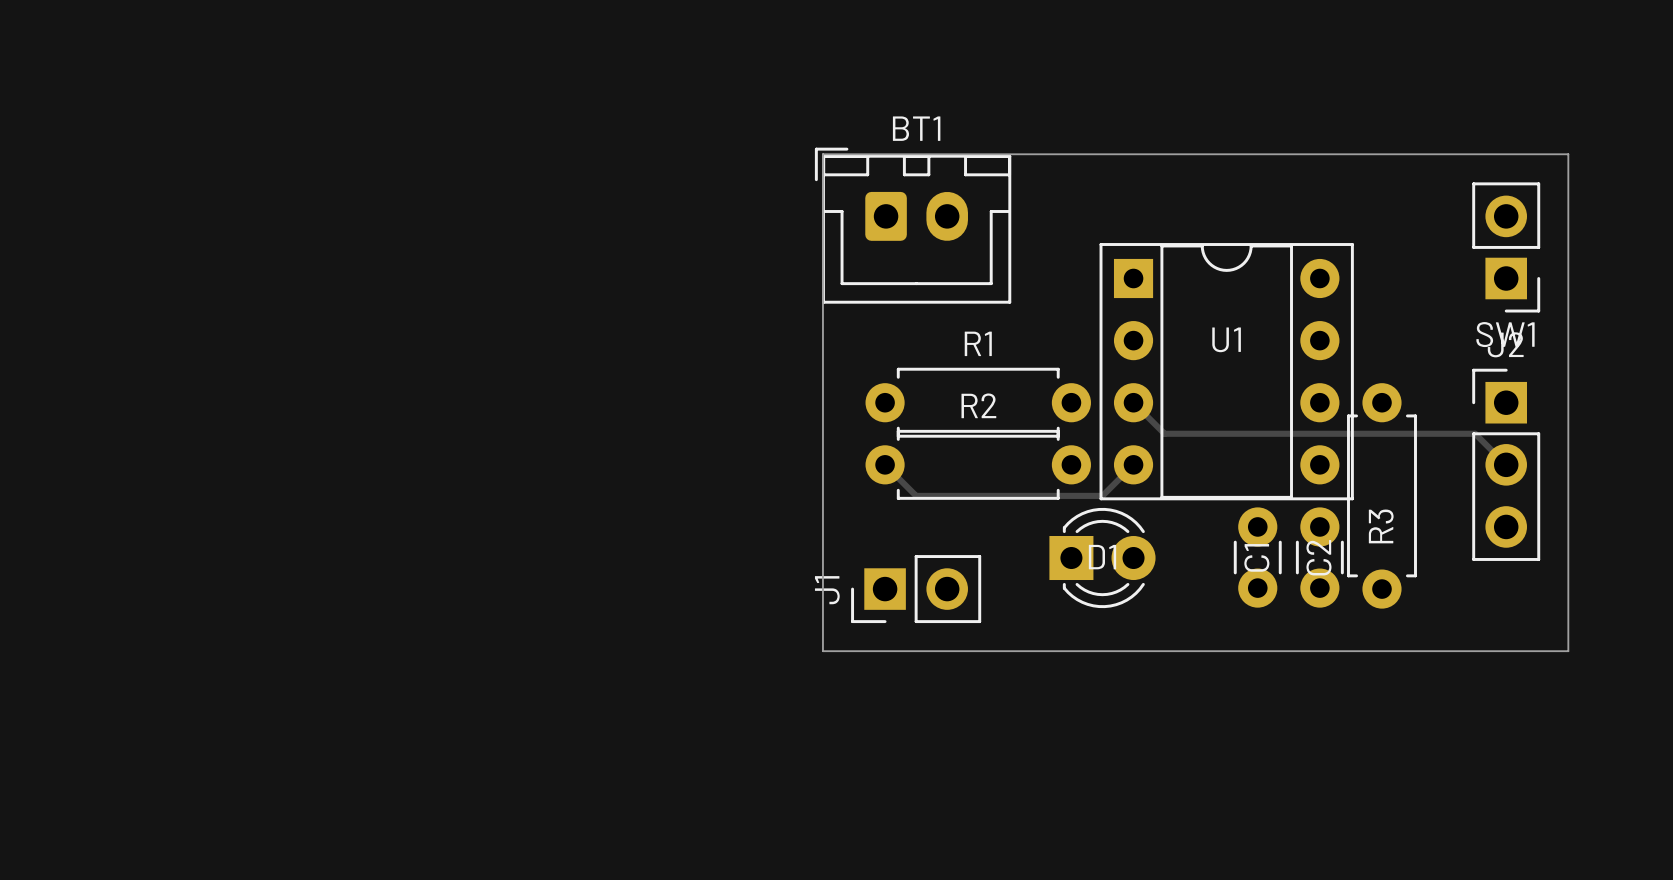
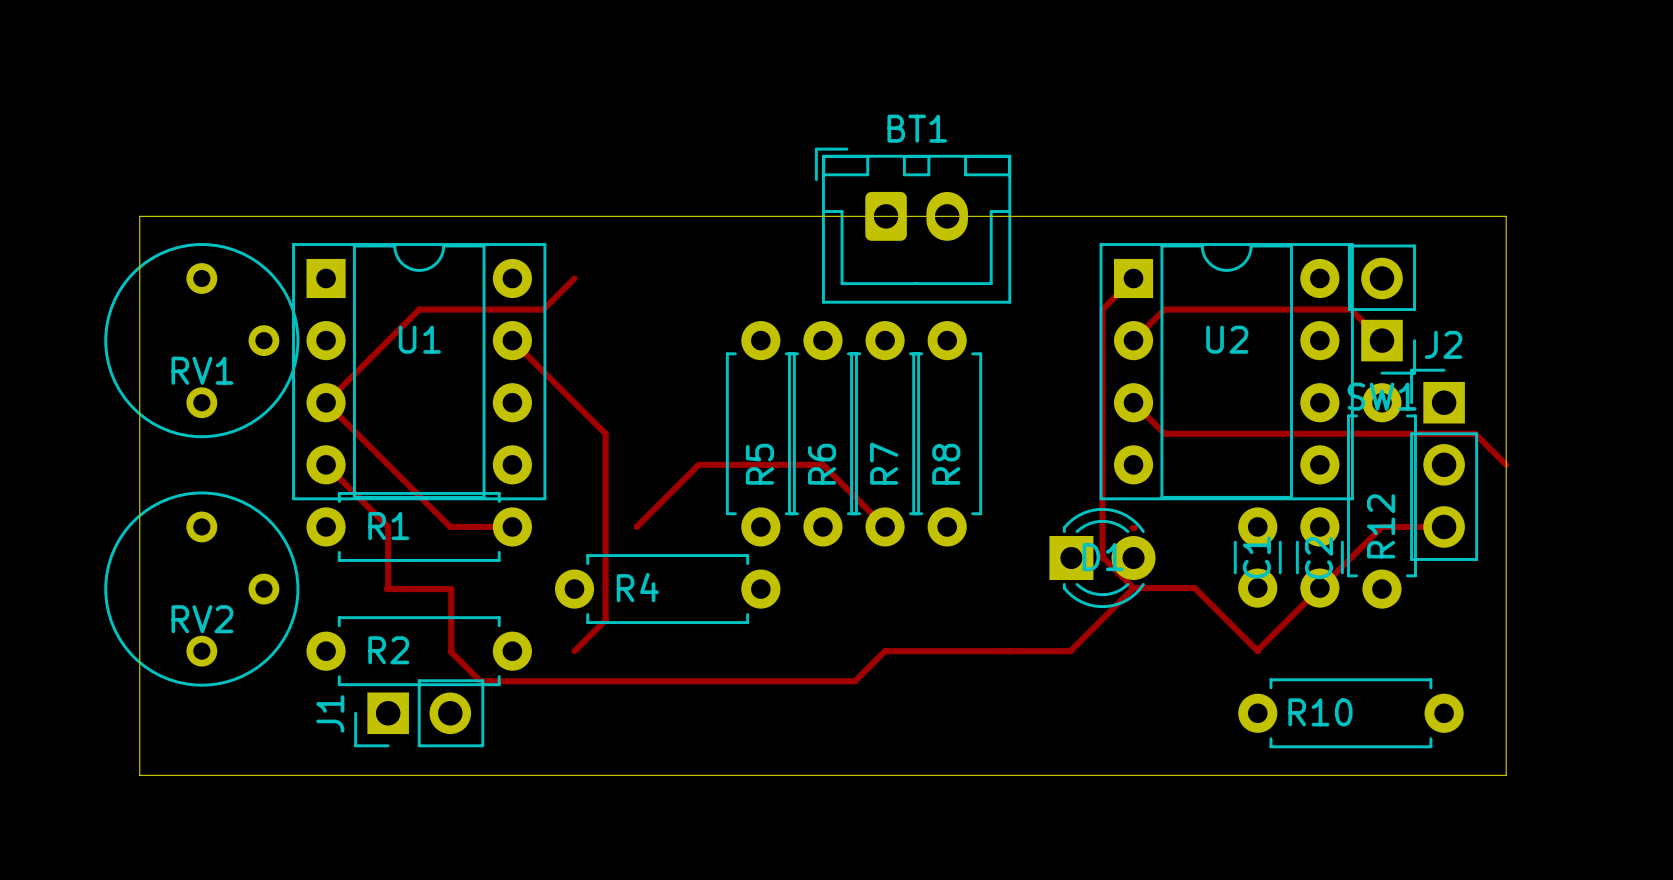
board edge: (822, 154) (822, 651) (1568, 651) (1568, 154) (822, 154) -> none
board edge: none -> (139, 216) (139, 775) (1506, 775) (1506, 216) (139, 216)
SW1 position: (1506, 247) -> (1381, 309)
track: none -> (574, 278) (543, 309) (419, 309) (326, 402) (450, 526) (512, 526)
track: none -> (1133, 278) (1102, 309) (1102, 558) (1133, 588)
U1 name: U1 (1226, 339) -> U2 (1227, 339)
RV1: none -> (201, 340)
track: none -> (512, 340) (605, 433) (605, 620) (574, 651)
track: none -> (1133, 340) (1164, 309) (1350, 309) (1381, 340)
R1 name position: R1 (978, 343) -> R1 (388, 526)
U1: none -> (419, 371)
R1 position: (978, 402) -> (419, 526)
R2 name position: R2 (978, 405) -> R2 (388, 650)
R5: none -> (760, 433)
R6: none -> (822, 433)
R7: none -> (885, 433)
R8: none -> (947, 433)
track: none -> (326, 464) (388, 526)
track: (885, 464) (916, 495) (1102, 495) (1133, 464) -> none
R2 position: (978, 464) -> (419, 651)
J2 position: (1506, 464) -> (1444, 464)
track: none -> (636, 526) (698, 464) (822, 464) (885, 526)
R3 name: R3 (1381, 526) -> R12 (1381, 526)
track: none -> (1444, 526) (1381, 526) (1320, 588)
track: none -> (388, 527) (388, 589)
track: none -> (1132, 527) (1134, 527)
track: none -> (387, 588) (451, 589) (451, 652) (480, 681) (855, 681) (885, 651) (1070, 651) (1133, 588)
track: none -> (1133, 588) (1194, 588) (1257, 651) (1319, 588)
RV2: none -> (201, 589)
R4: none -> (667, 589)
J1 position: (916, 589) -> (419, 713)
R10: none -> (1350, 713)

